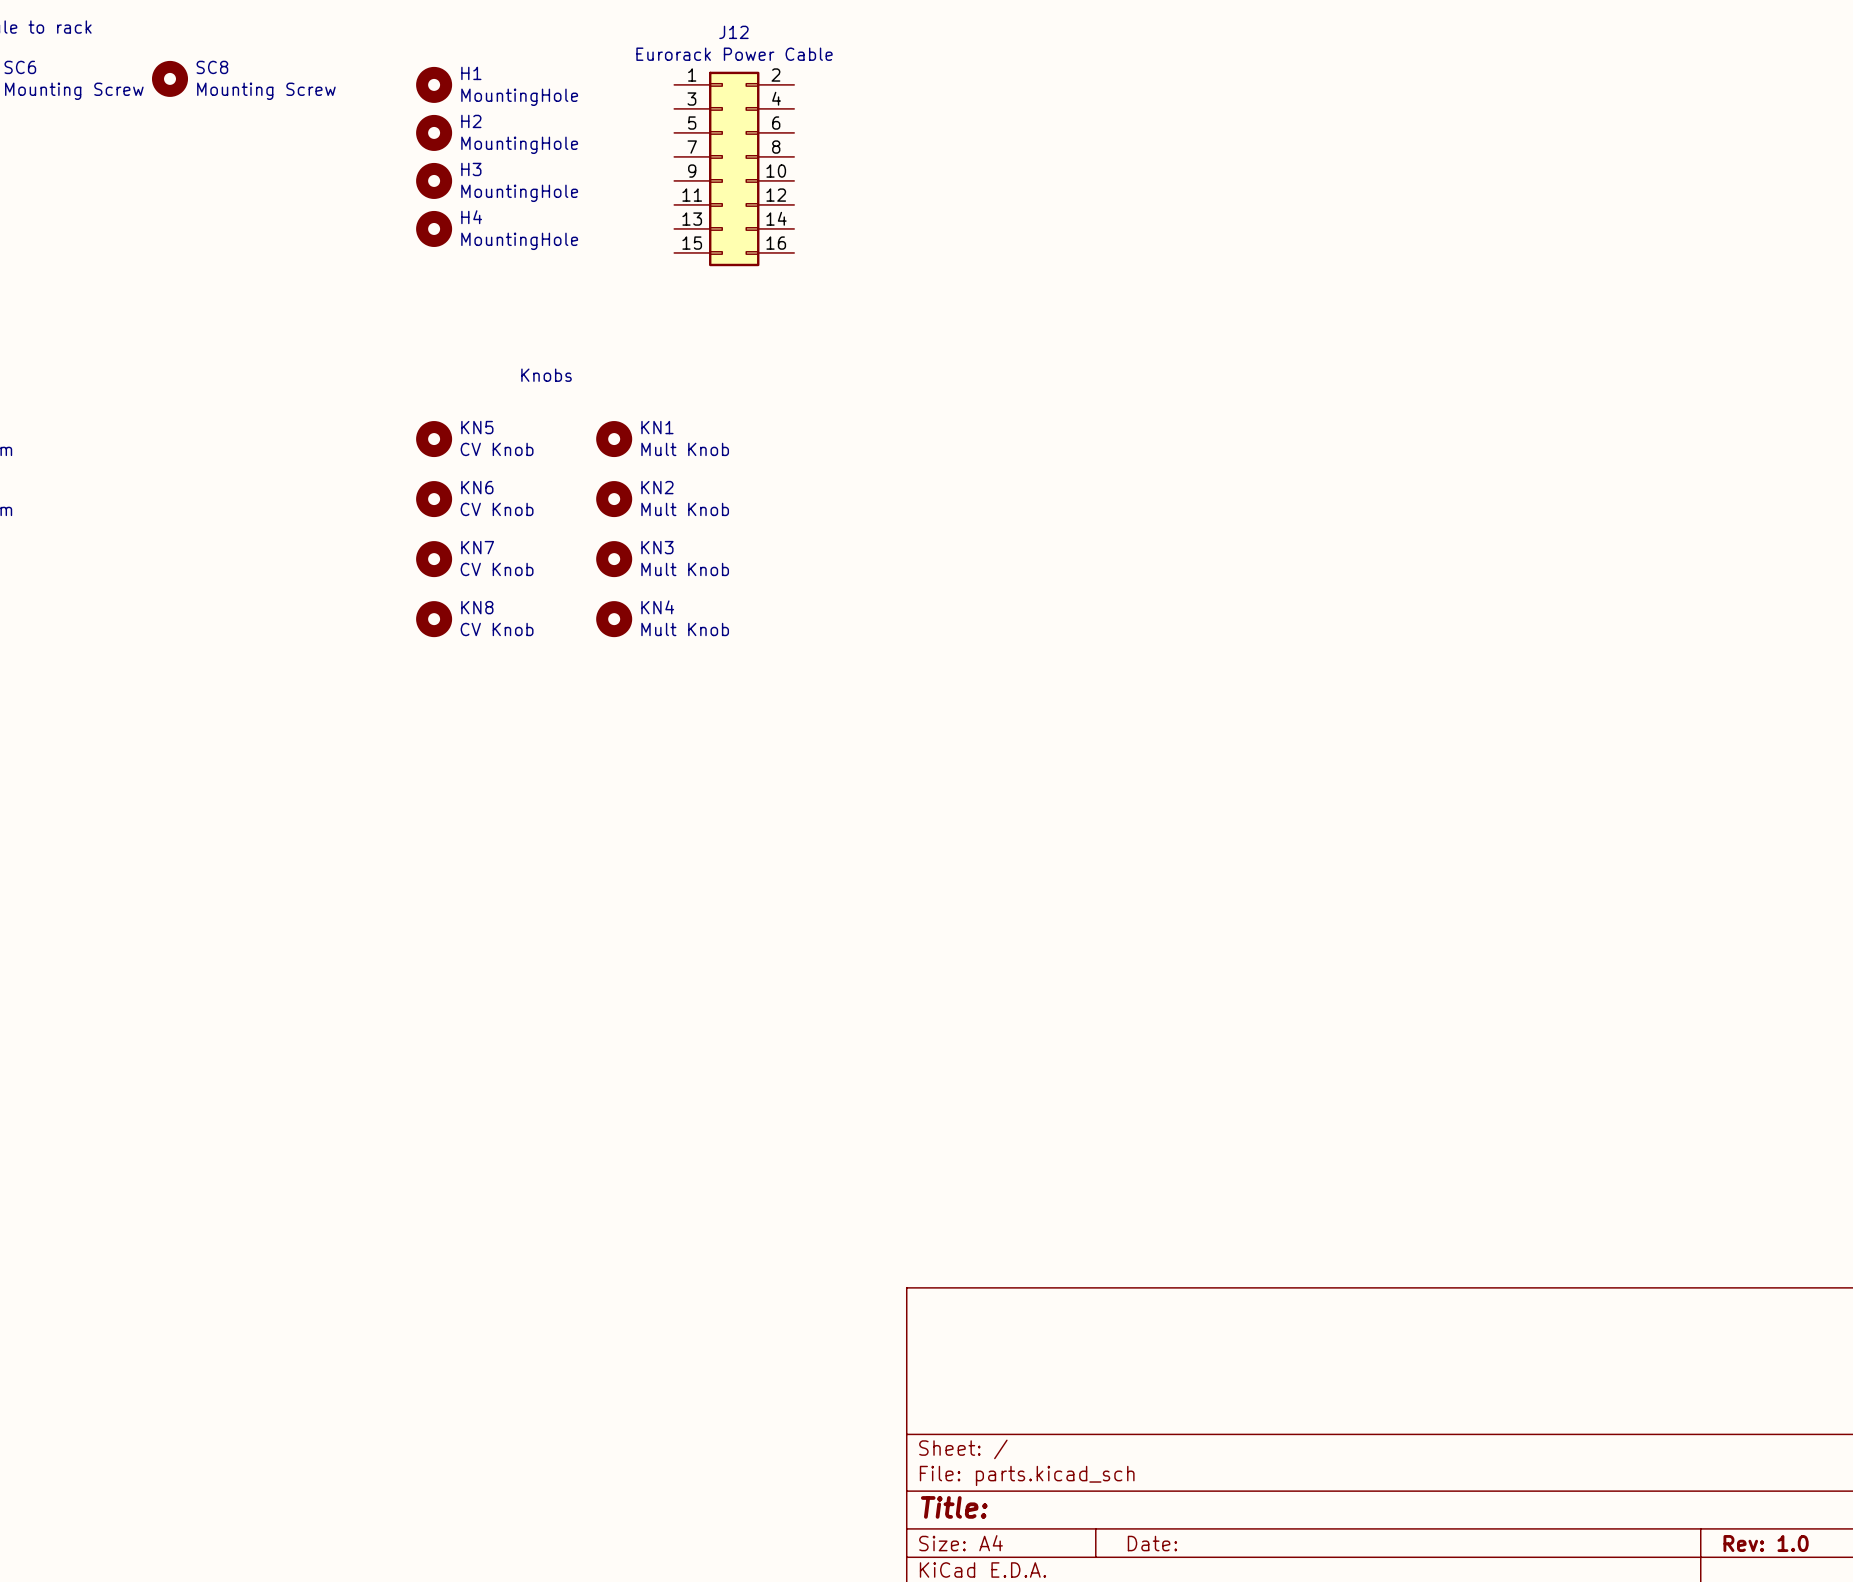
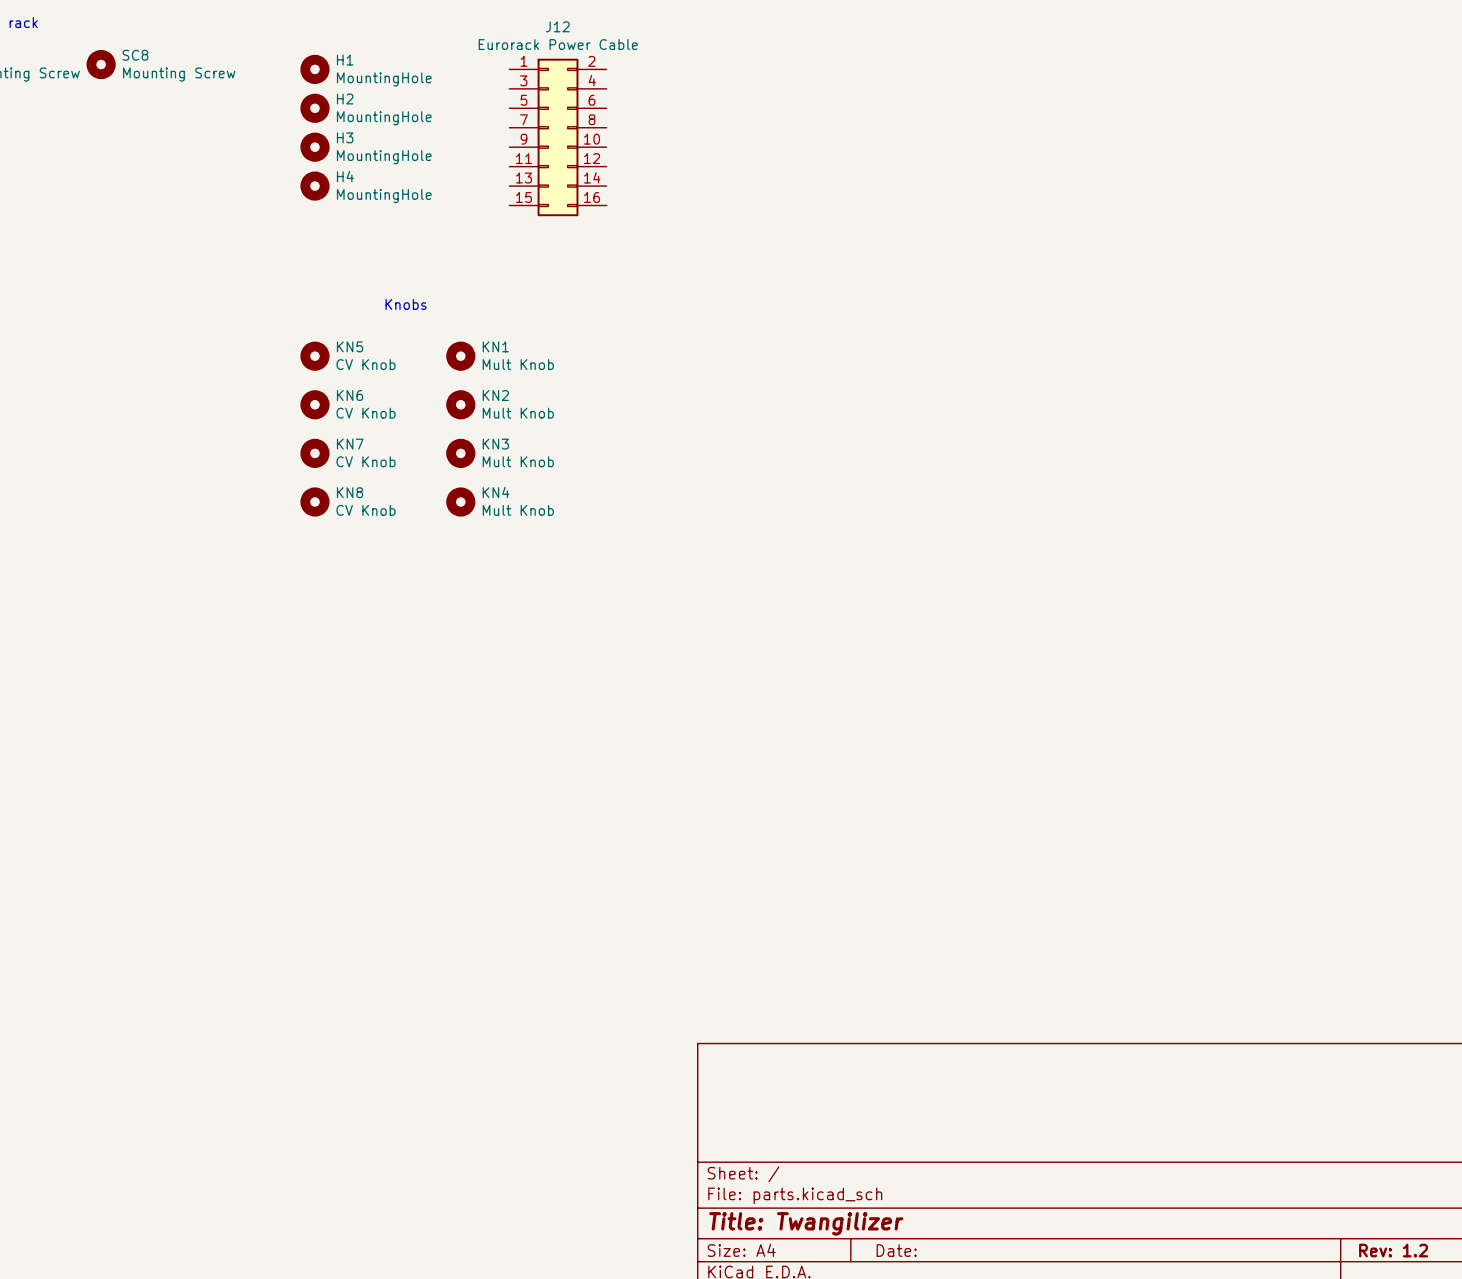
title block: Title: (954, 1507) -> Title: Twangilizer (806, 1223)
title block: Rev: 1.0 (1766, 1543) -> Rev: 1.2 (1393, 1250)

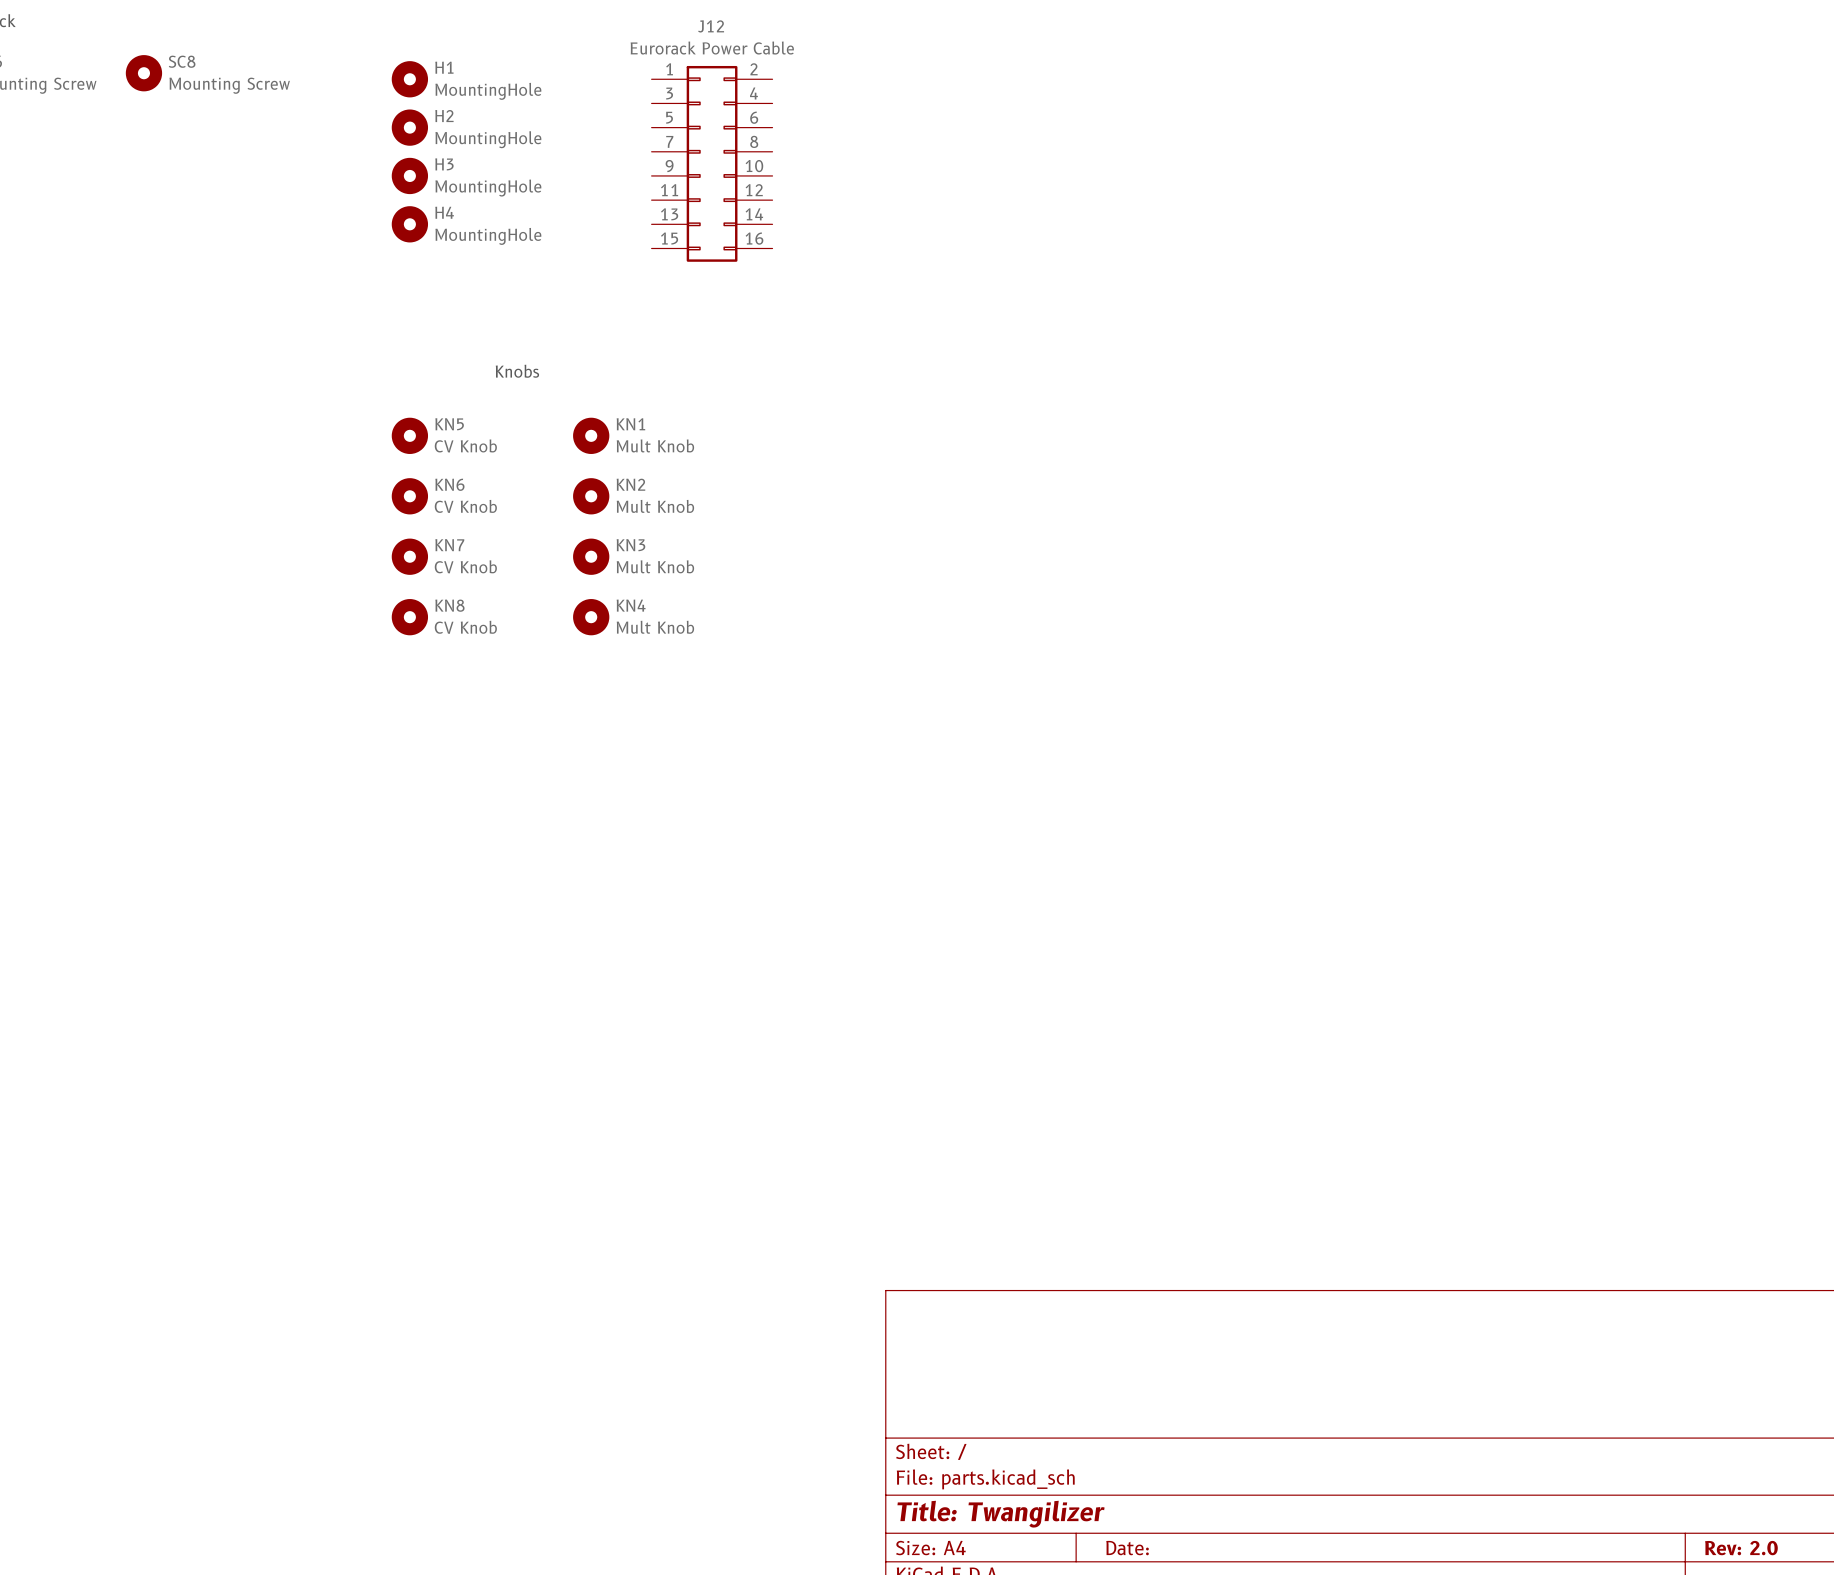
title block: Rev: 1.2 (1393, 1250) -> Rev: 2.0 (1741, 1548)

